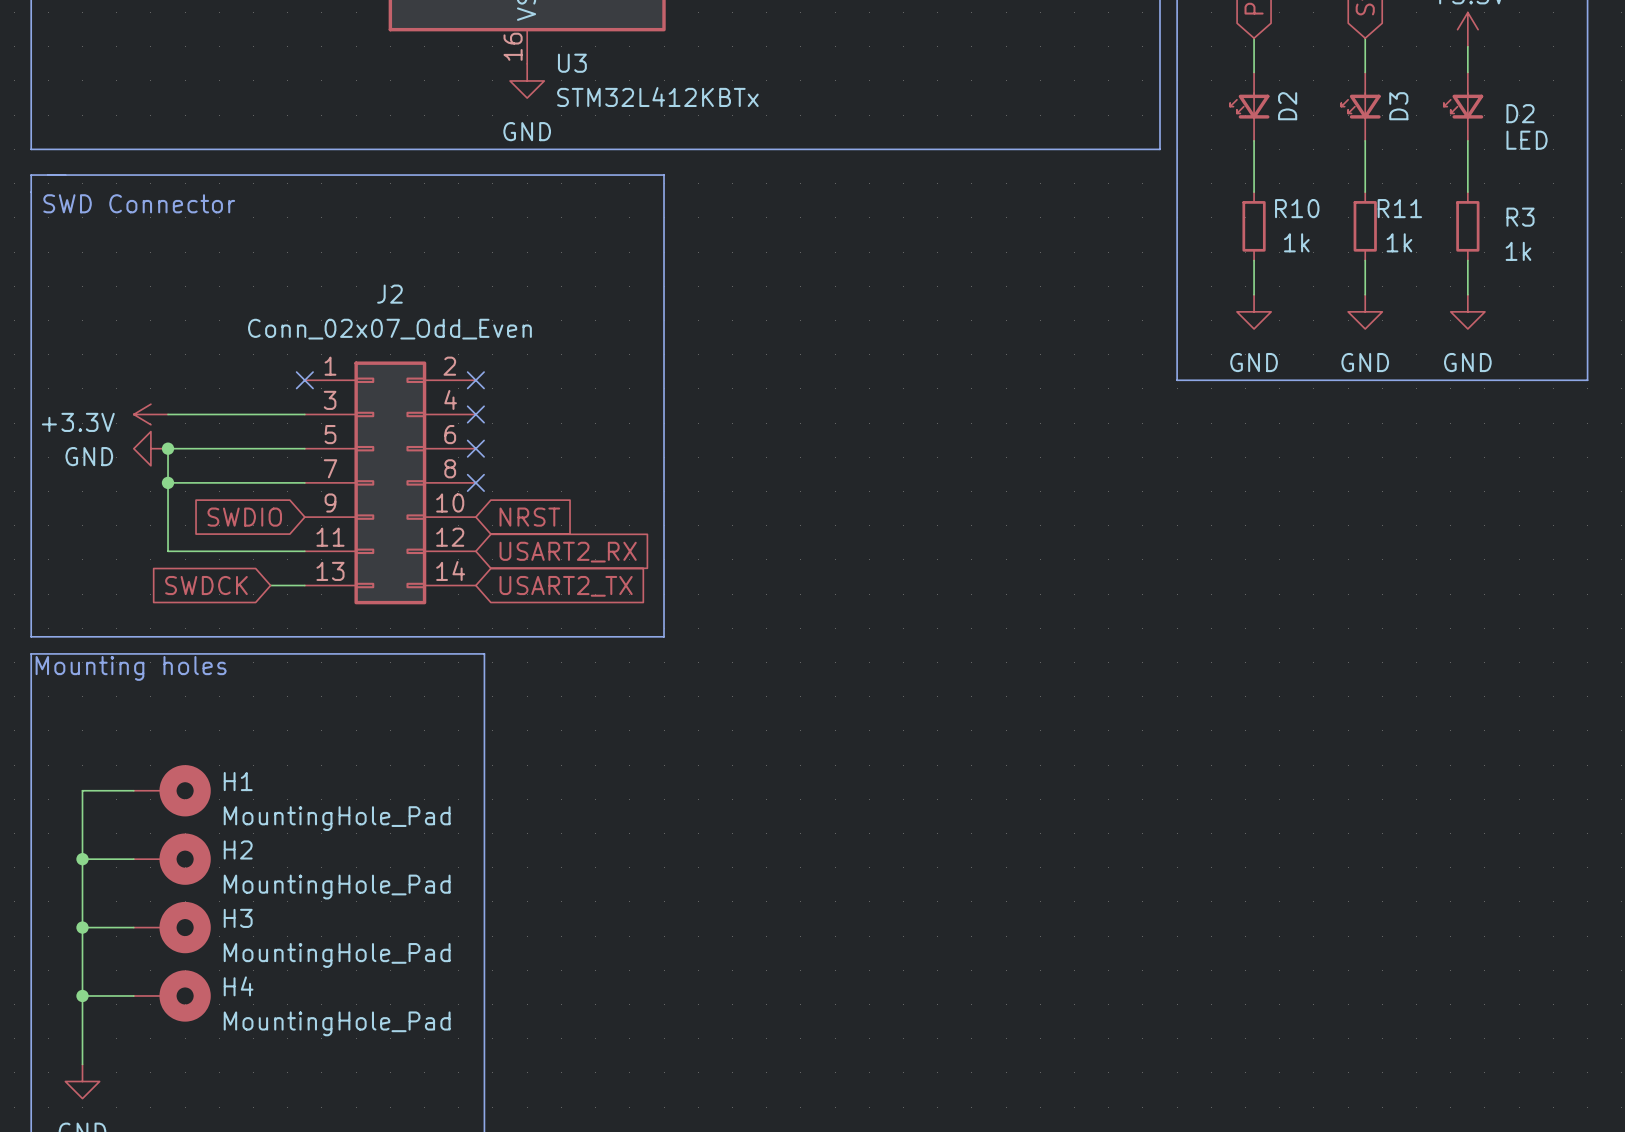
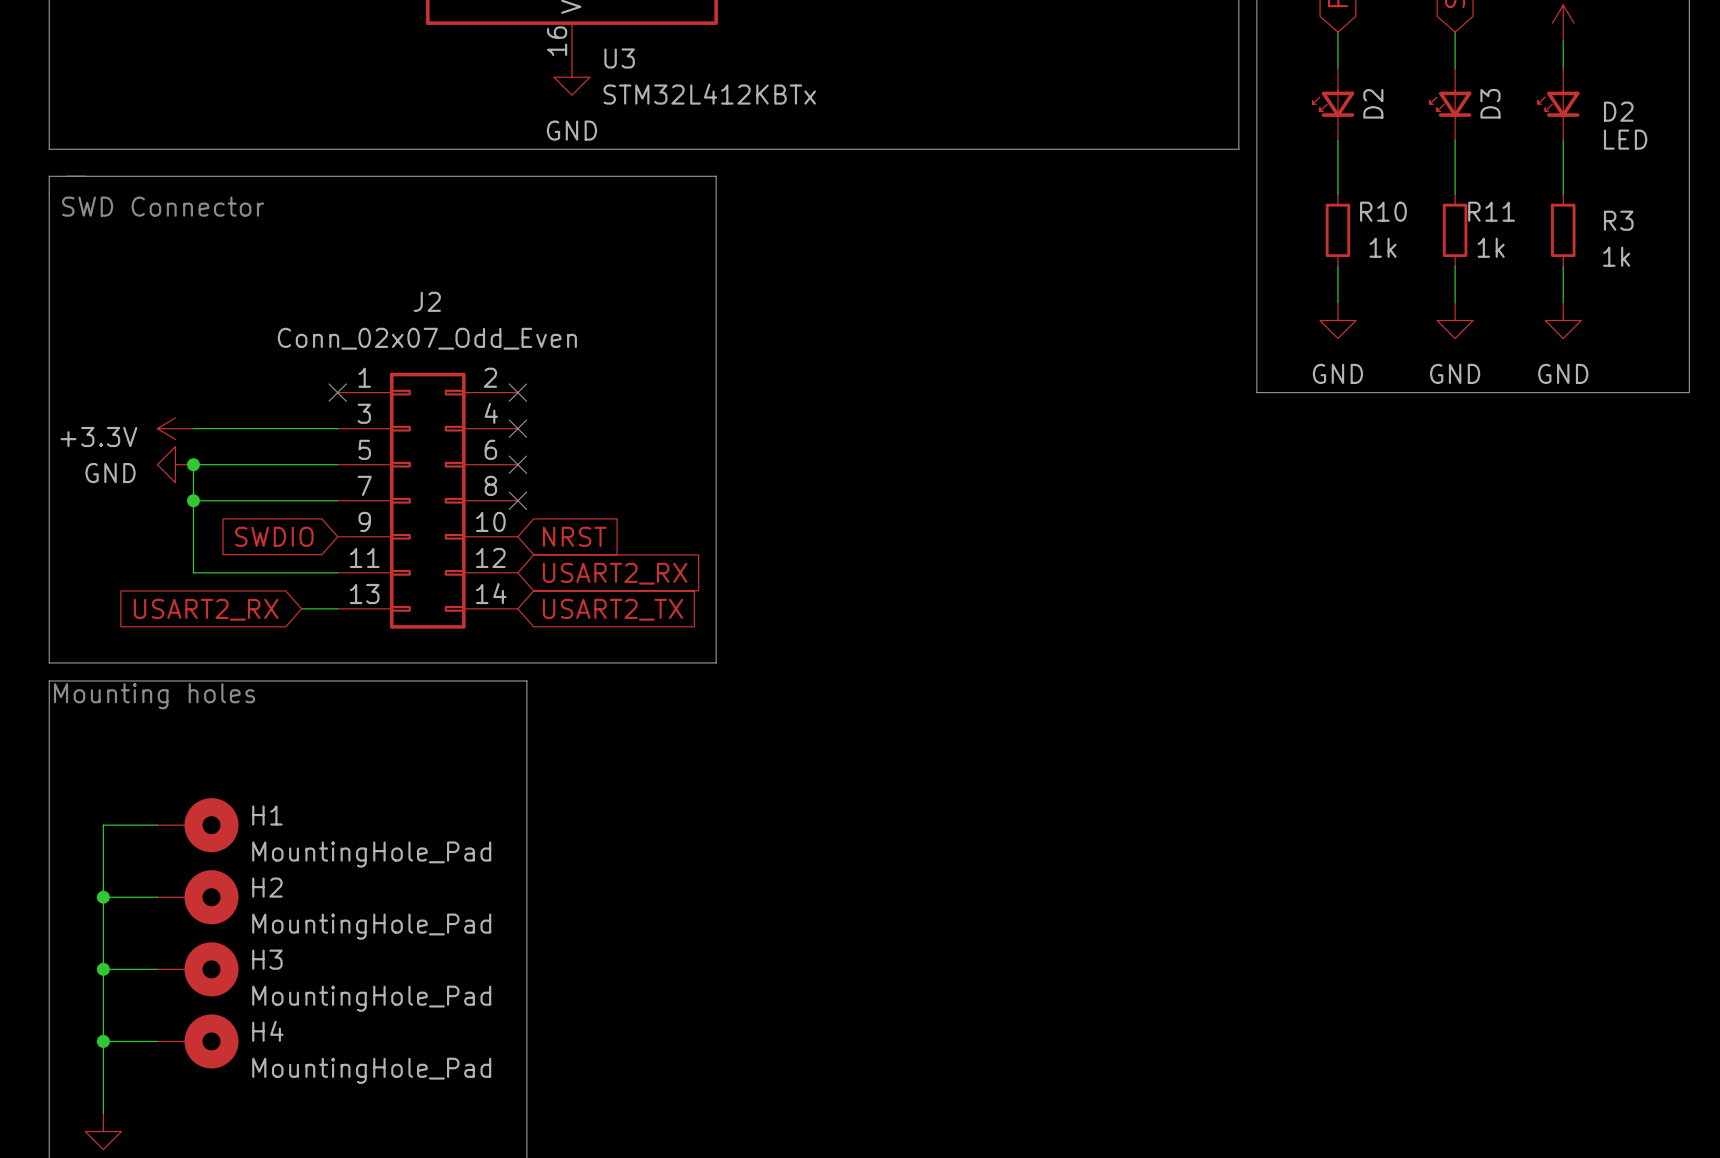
global label: SWDCK (206, 585) -> USART2_RX (206, 609)

